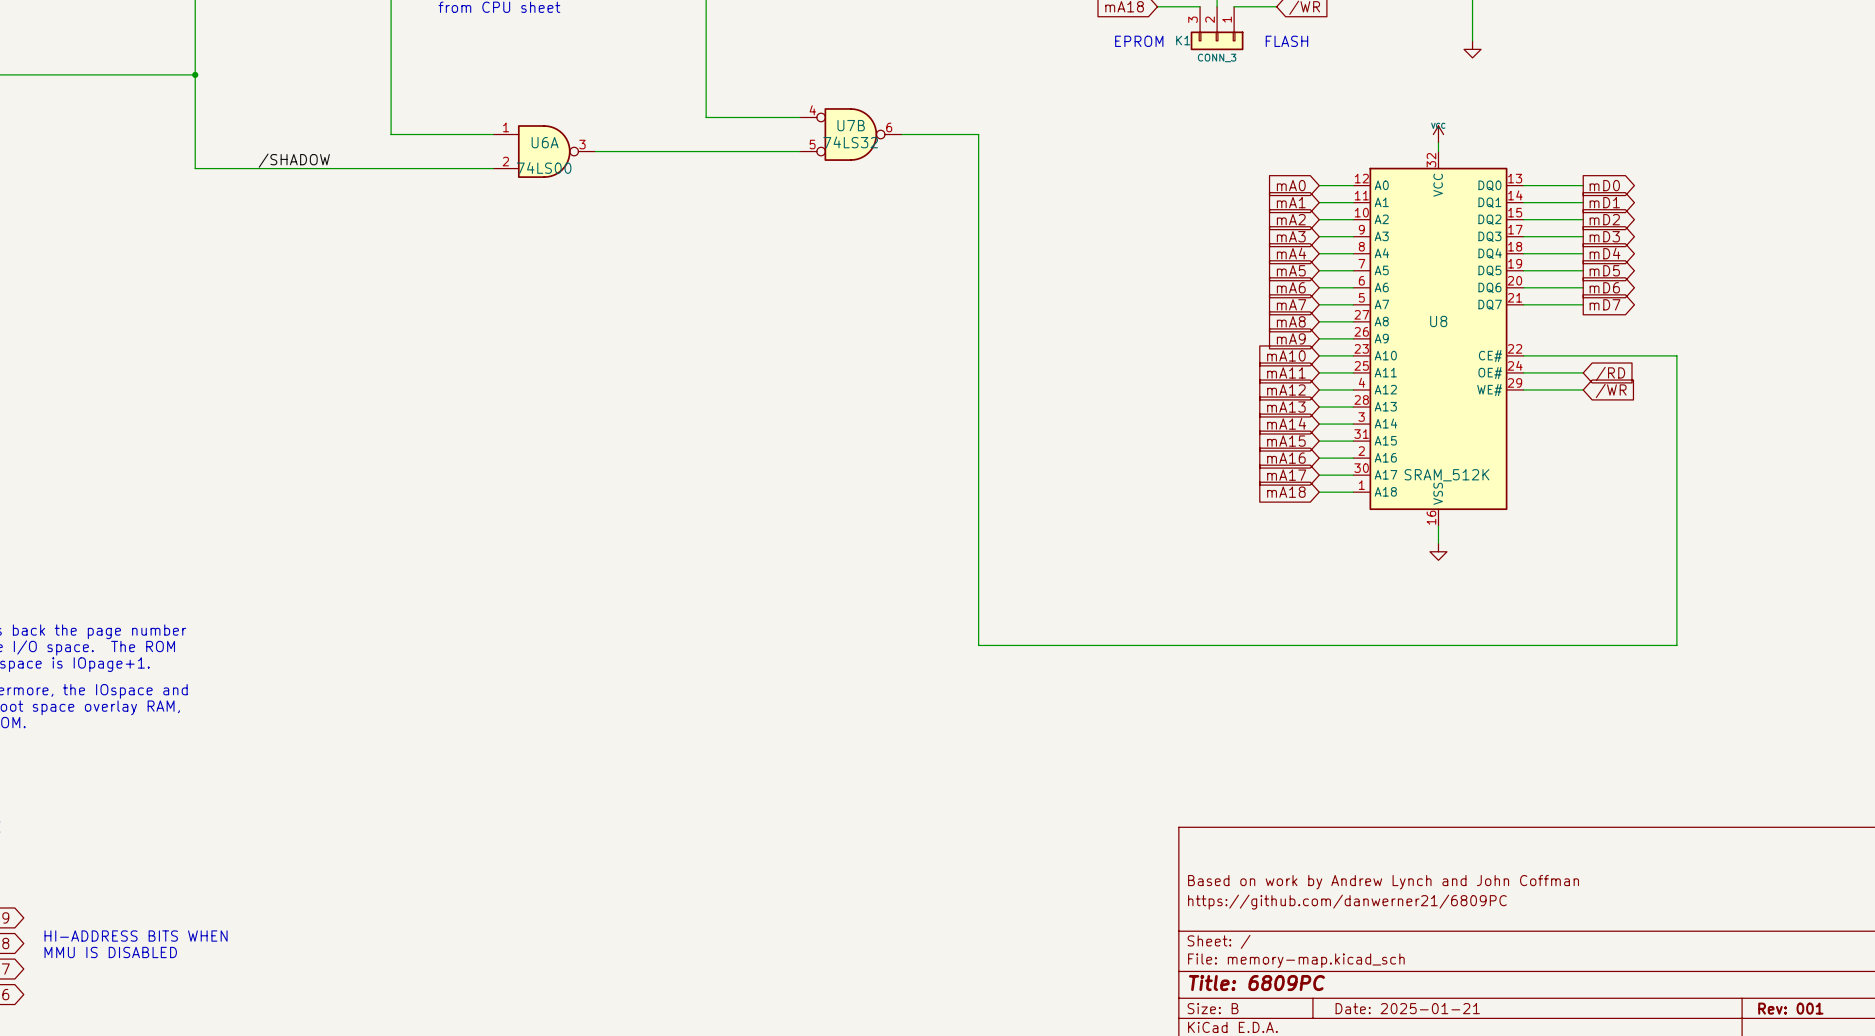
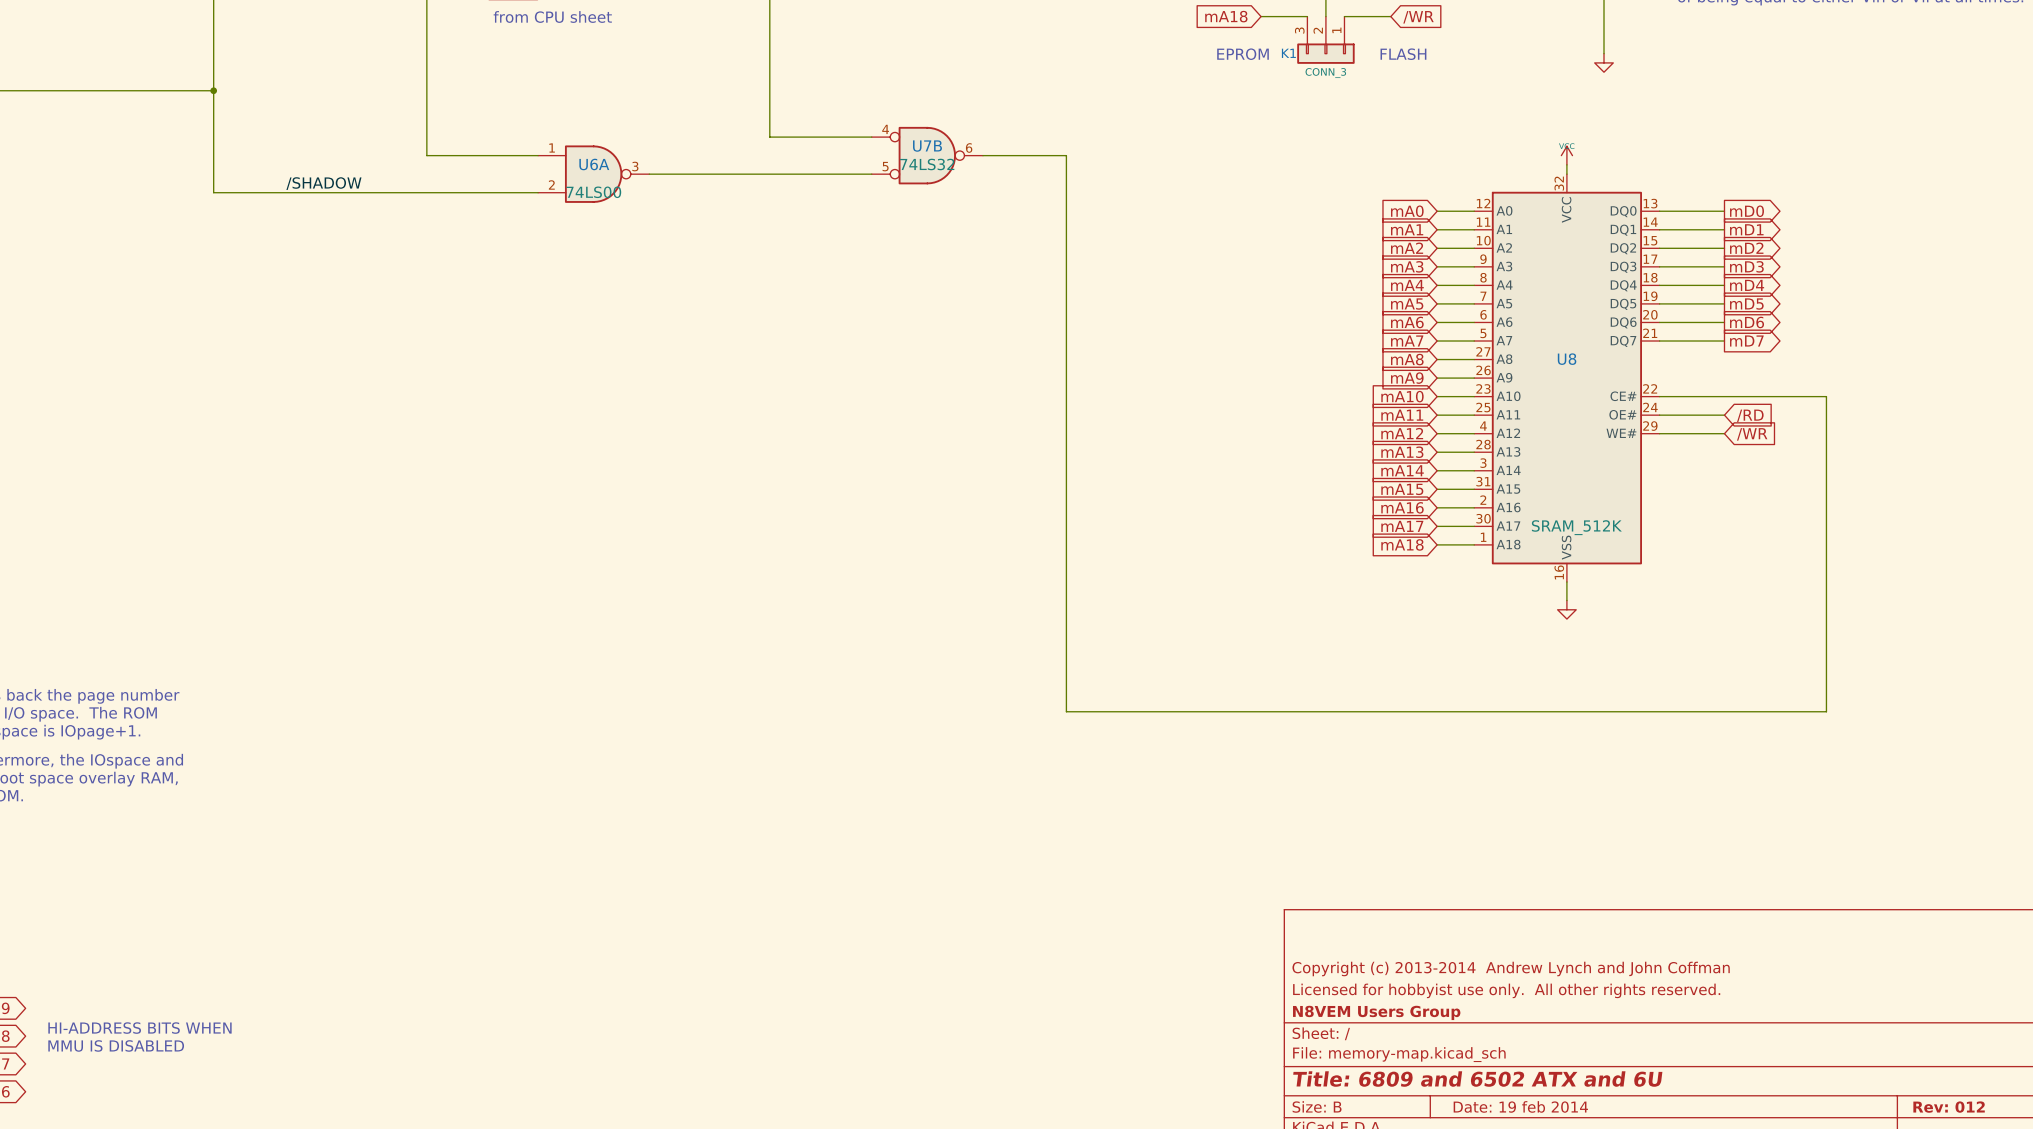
title block: Based on work by Andrew Lynch and John Coffman (1383, 882) -> Copyright (c) 2013-2014 Andrew Lynch and John Coffman (1511, 968)
title block: https://github.com/danwerner21/6809PC (1347, 902) -> Licensed for hobbyist use only. All other rights reserved. (1506, 990)
title block: none -> N8VEM Users Group (1376, 1012)
title block: Title: 6809PC (1256, 983) -> Title: 6809 and 6502 ATX and 6U (1477, 1079)
title block: Date: 2025-01-21 (1407, 1008) -> Date: 19 feb 2014 (1520, 1106)
title block: Rev: 001 (1790, 1008) -> Rev: 012 (1949, 1107)

